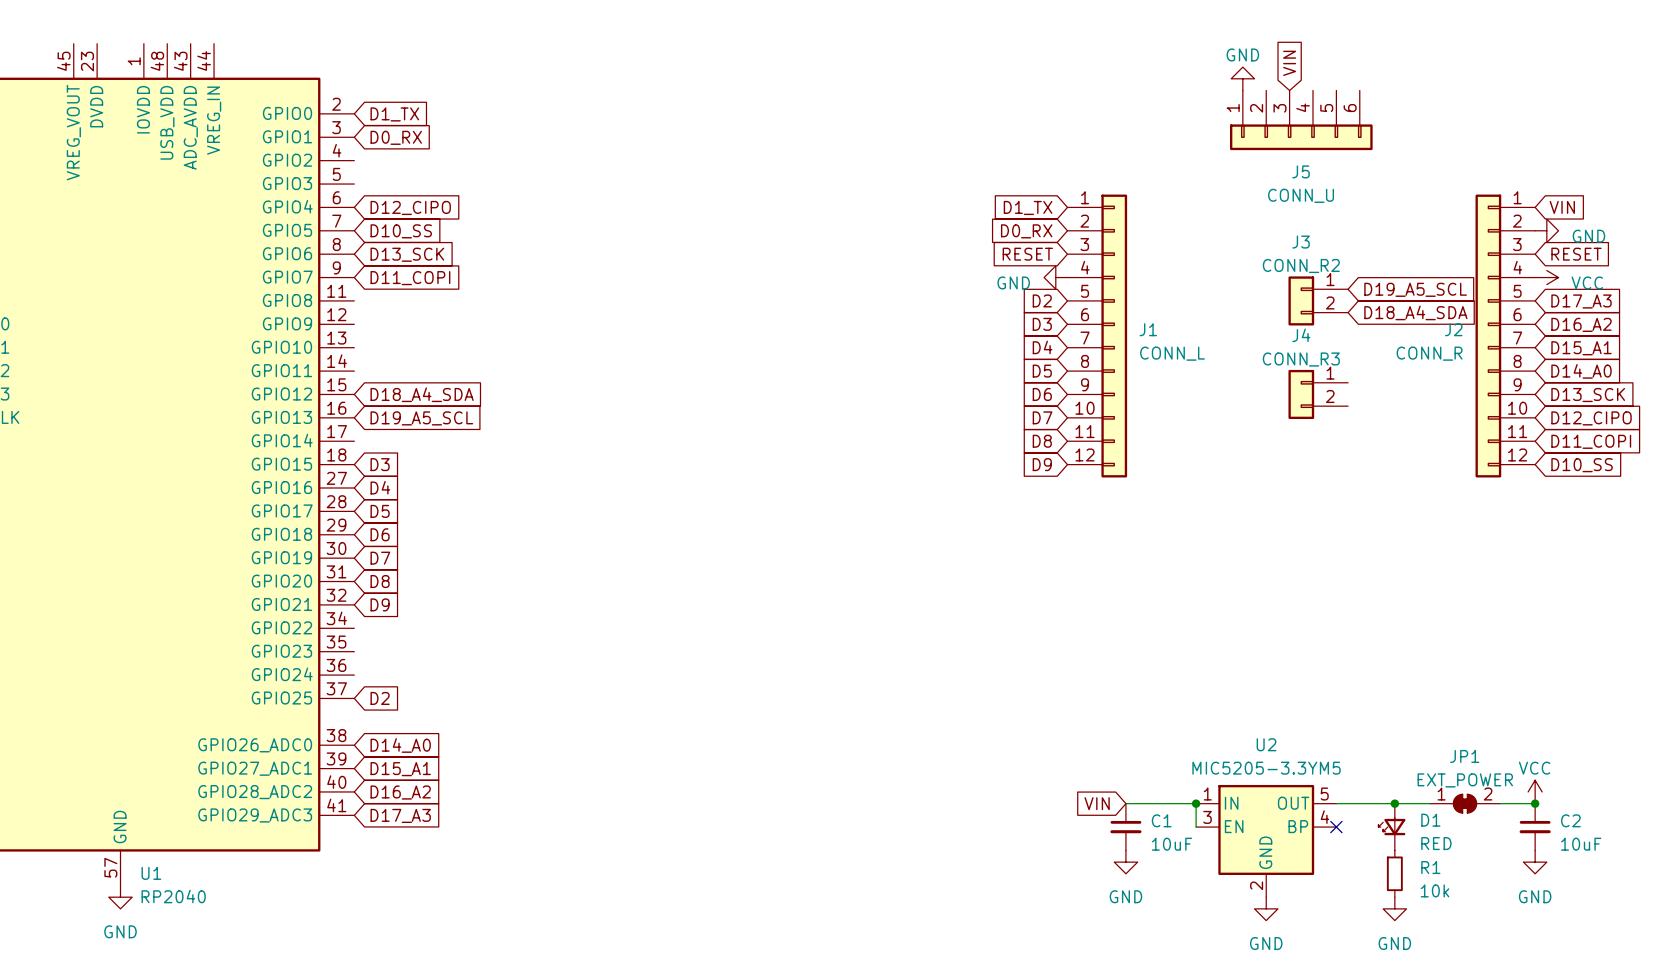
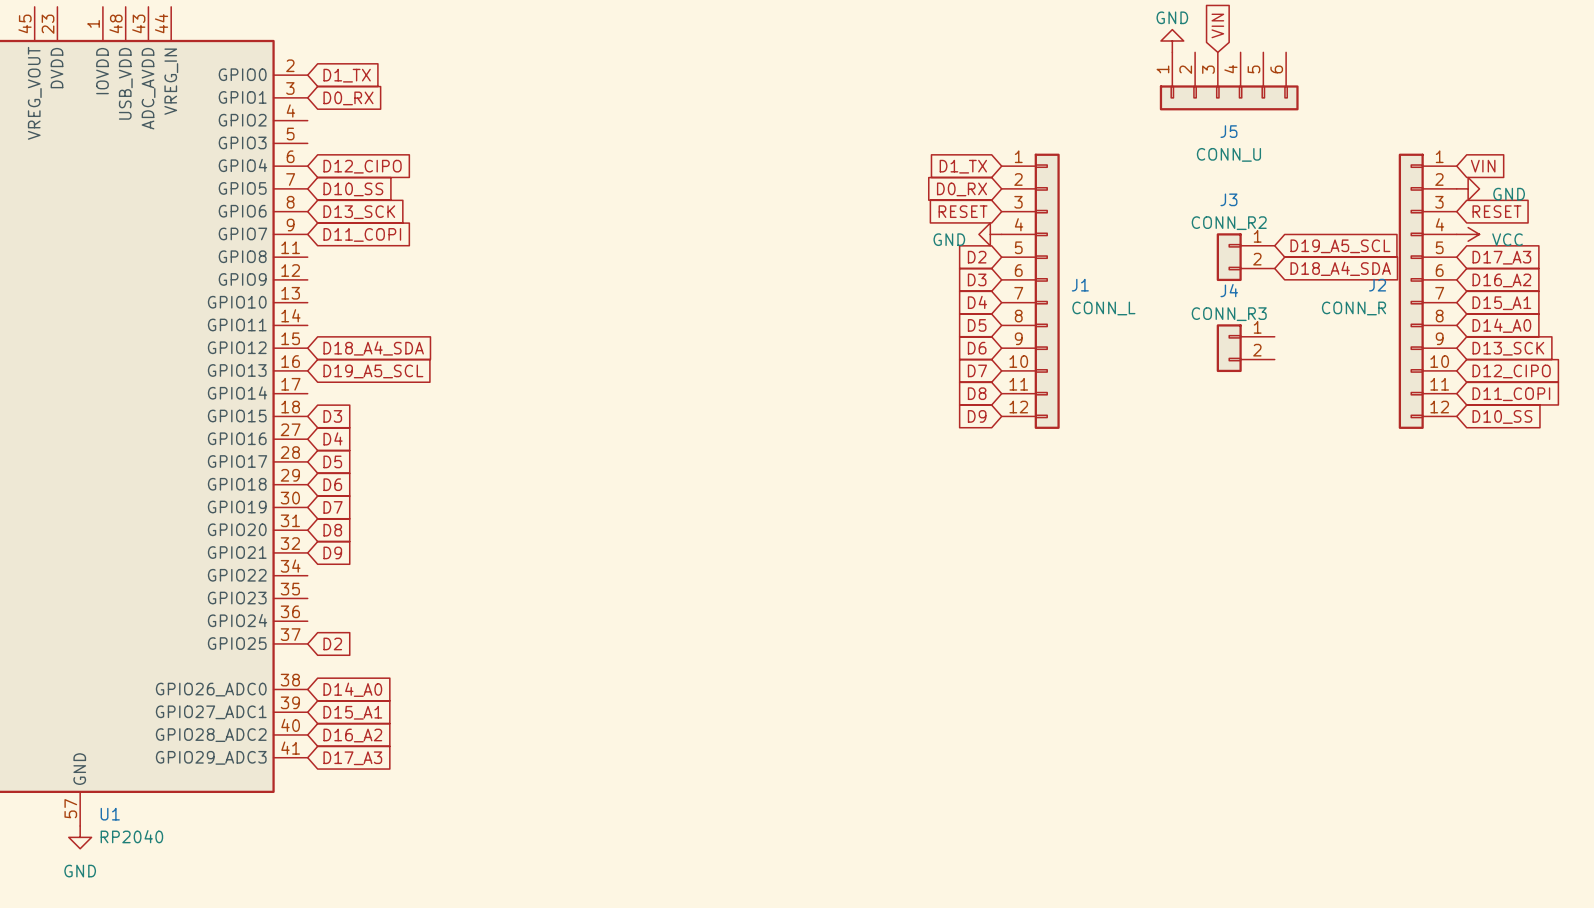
power symbol: VCC (1535, 791) -> none
global label: VIN (1097, 803) -> none
wire: (1125, 803) (1196, 803) (1196, 827) -> none
junction: (1196, 803) -> none
wire: (1336, 803) (1429, 803) -> none
junction: (1394, 803) -> none
JP1: EXT_POWER (1464, 803) -> none
wire: (1500, 803) (1535, 803) -> none
junction: (1535, 803) -> none
C1: 10uF (1125, 827) -> none
no-connect mark: (1336, 827) -> none
D1: RED (1391, 827) -> none
C2: 10uF (1535, 827) -> none
U2: MIC5205-3.3YM5 (1266, 841) -> none
power symbol: GND (1125, 862) -> none
power symbol: GND (1535, 862) -> none
R1: 10k (1394, 873) -> none
power symbol: GND (1266, 908) -> none
power symbol: GND (1394, 908) -> none

